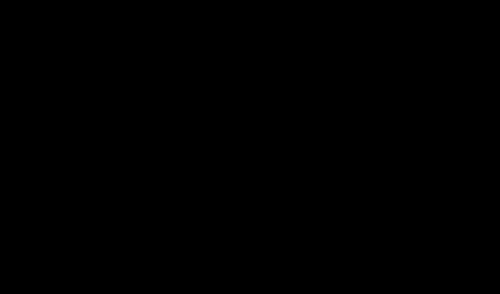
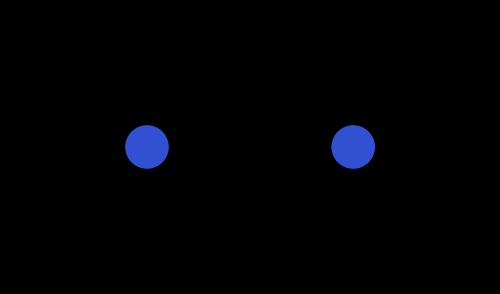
part: none -> (146, 146)
part: none -> (353, 146)

